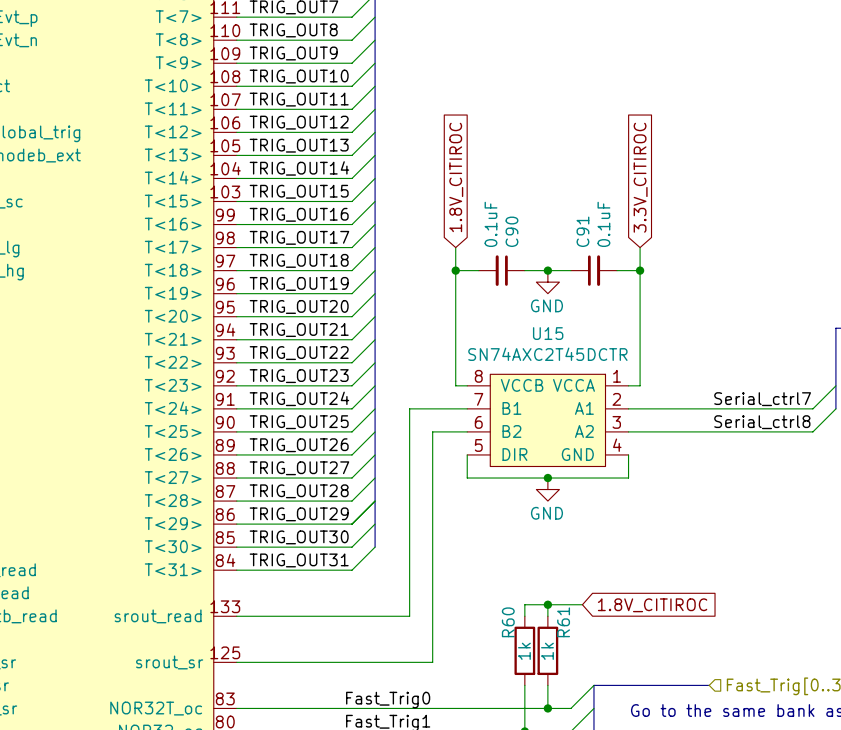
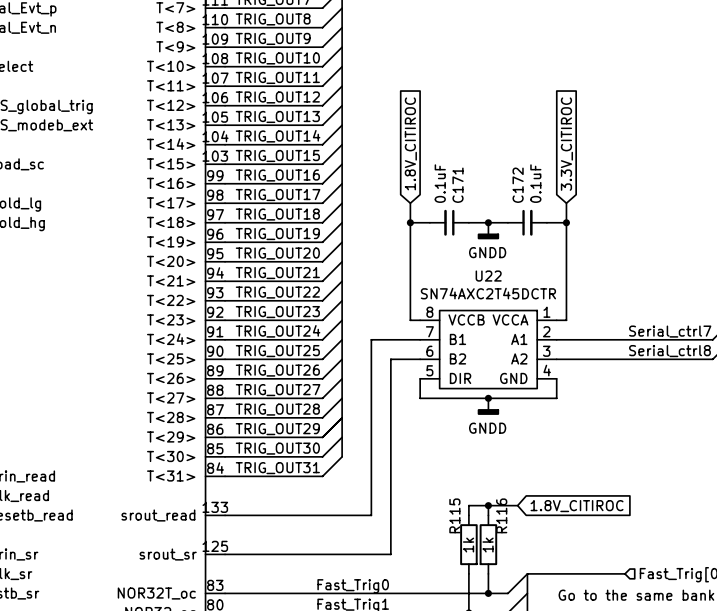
C90 name: C90 (511, 231) -> C171 (458, 185)
C91 name: C91 (582, 231) -> C172 (518, 185)
power symbol: GND (547, 282) -> GNDD (488, 231)
U15 name: U15 (548, 333) -> U22 (488, 276)
power symbol: GND (547, 489) -> GNDD (488, 406)
R60 name: R60 (508, 622) -> R115 (454, 515)
R61 name: R61 (563, 622) -> R116 (501, 515)

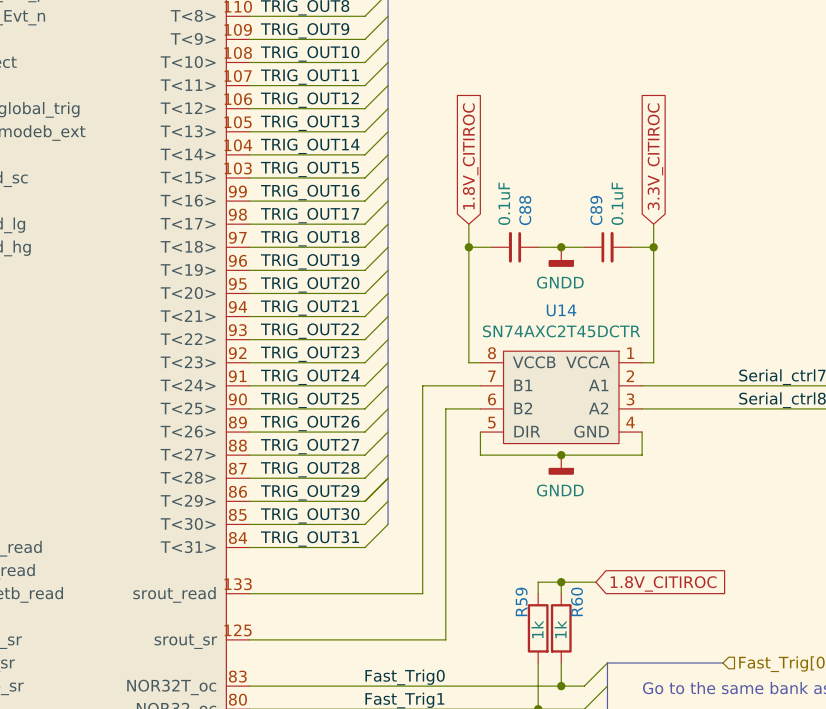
C171 name: C171 (458, 185) -> C88 (525, 210)
C172 name: C172 (518, 185) -> C89 (596, 210)
U22 name: U22 (488, 276) -> U14 (561, 310)
R115 name: R115 (454, 515) -> R59 (521, 601)
R116 name: R116 (501, 515) -> R60 (577, 601)

